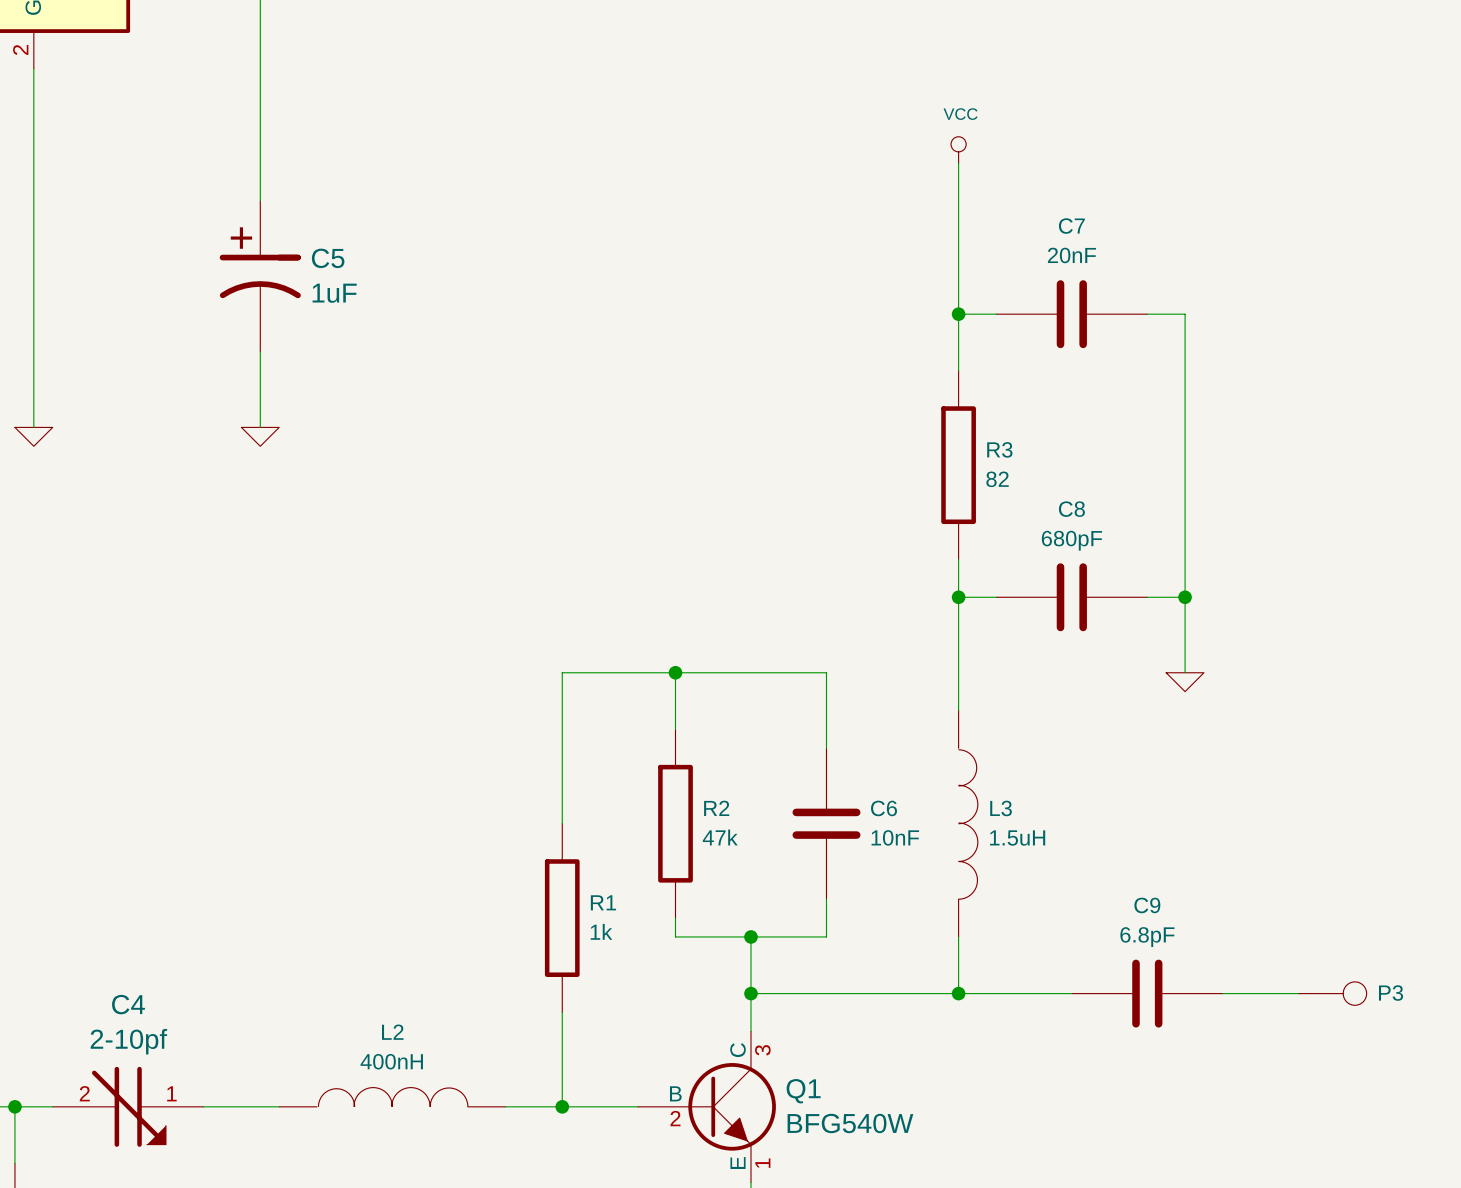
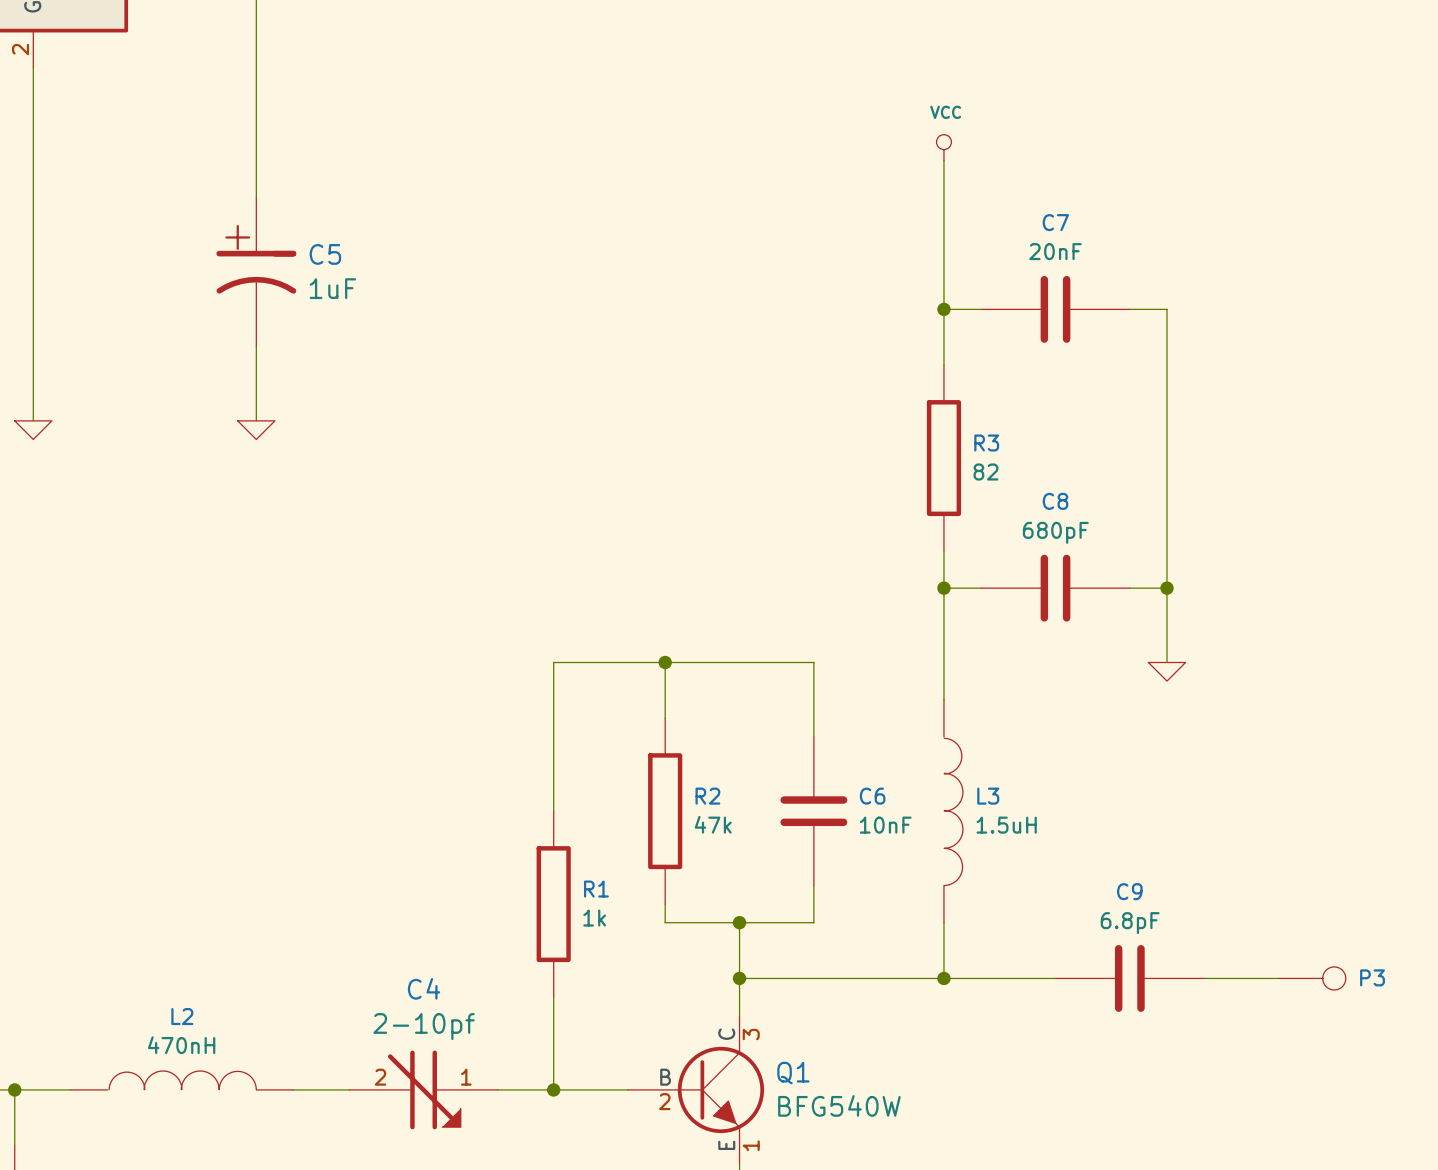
L2 value: 400nH (391, 1061) -> 470nH (181, 1045)
L2 position: (392, 1097) -> (181, 1080)
C4 position: (128, 1106) -> (423, 1089)
wire: (203, 1106) (279, 1106) -> none
wire: none -> (293, 1089) (349, 1089)

